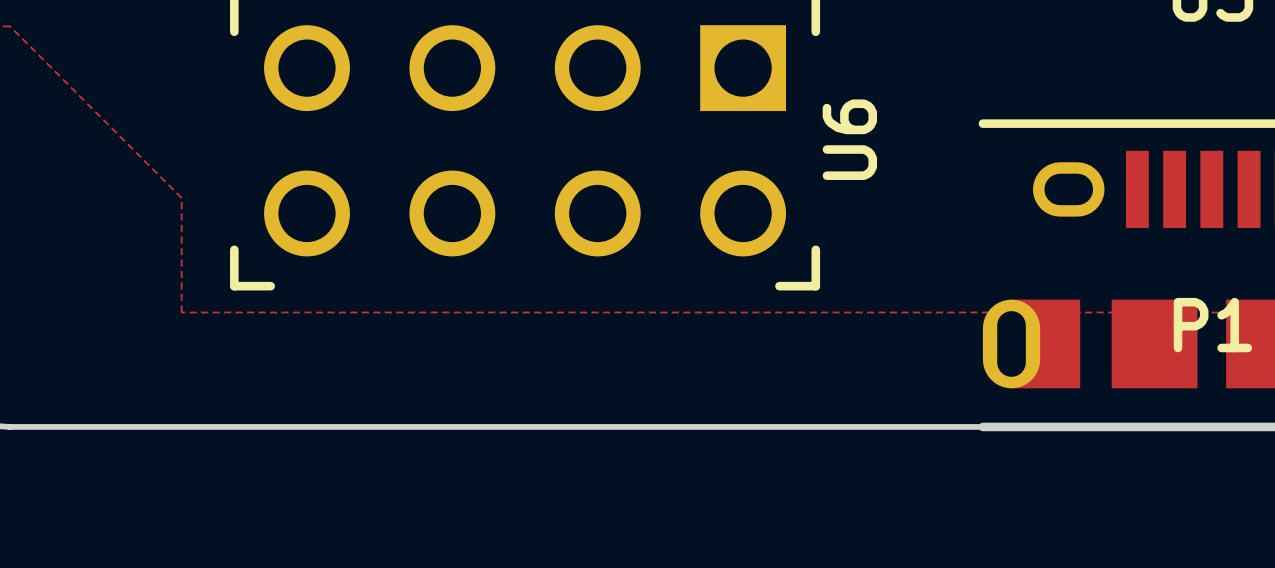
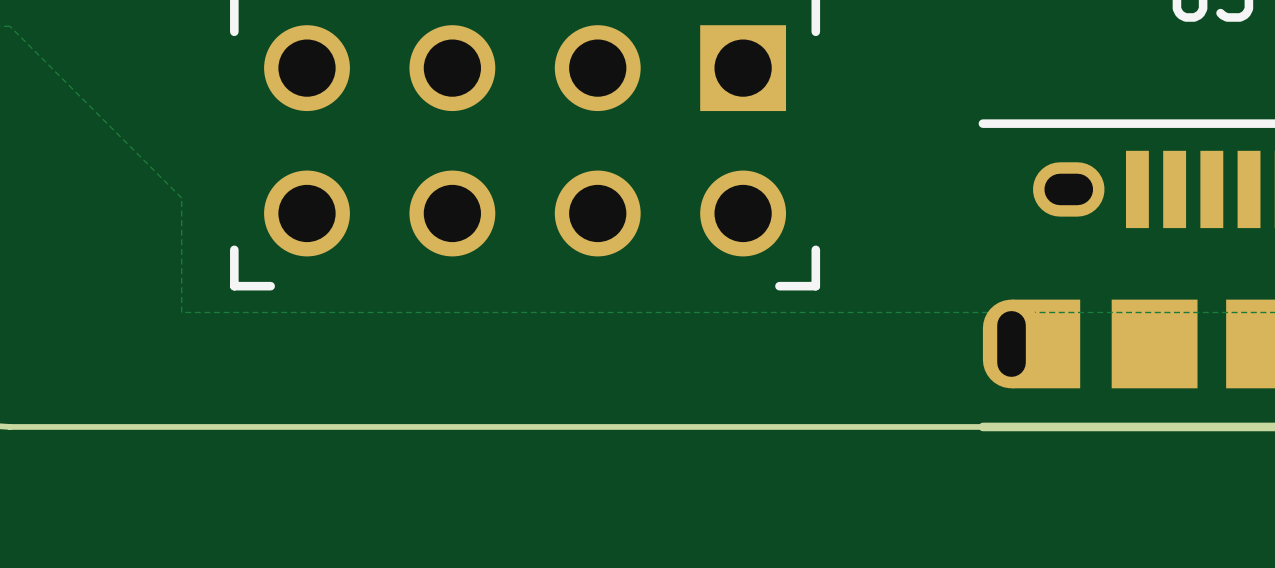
U6 name: U6 (849, 139) -> none
P1 name: P1 (1212, 325) -> none

